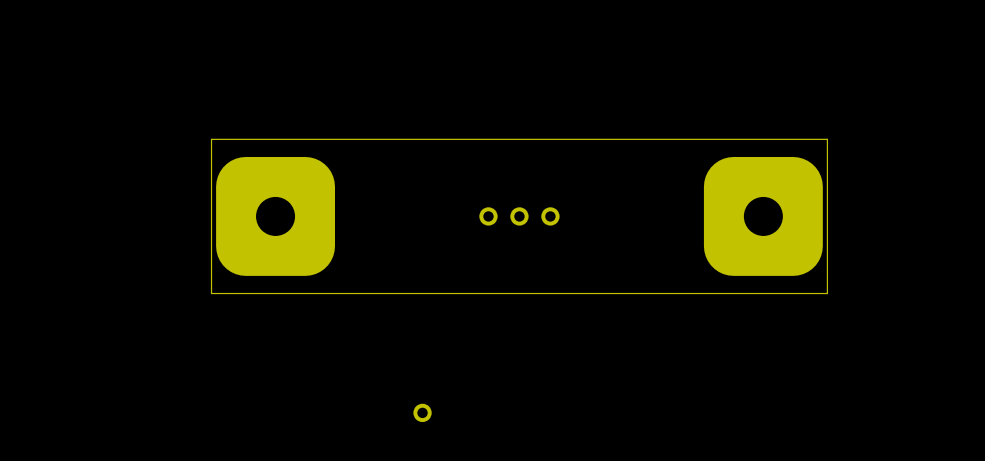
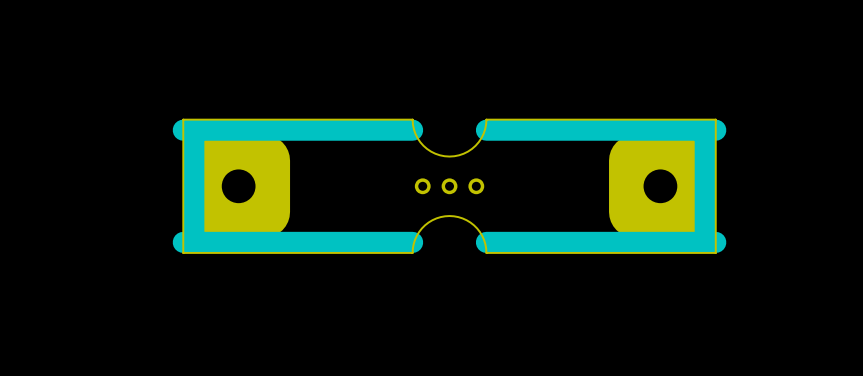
board edge: (562, 139) (476, 139) -> (486, 119) (483, 133) (475, 145) (463, 153) (449, 156) (435, 153) (423, 145) (415, 133) (412, 119)
line: none -> (193, 130) (193, 242)
line: none -> (412, 130) (183, 130)
line: none -> (705, 130) (705, 242)
line: none -> (715, 130) (486, 130)
line: none -> (412, 242) (183, 242)
line: none -> (715, 242) (486, 242)
board edge: (562, 293) (476, 293) -> (486, 252) (482, 235) (474, 225) (462, 218) (449, 216) (436, 218) (425, 225) (415, 239) (412, 252)
part: (422, 412) -> none

